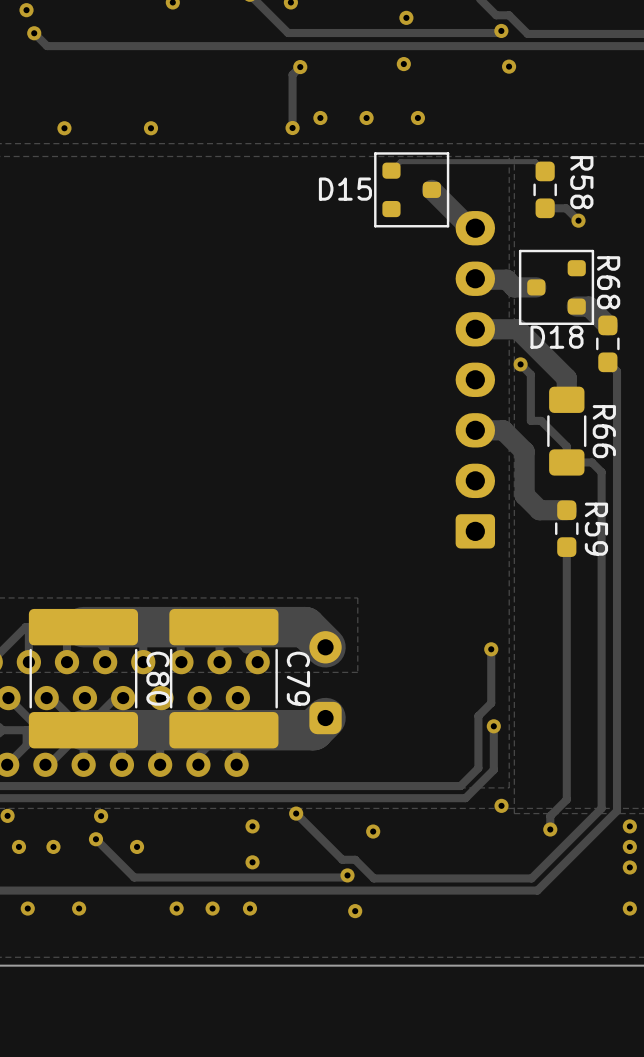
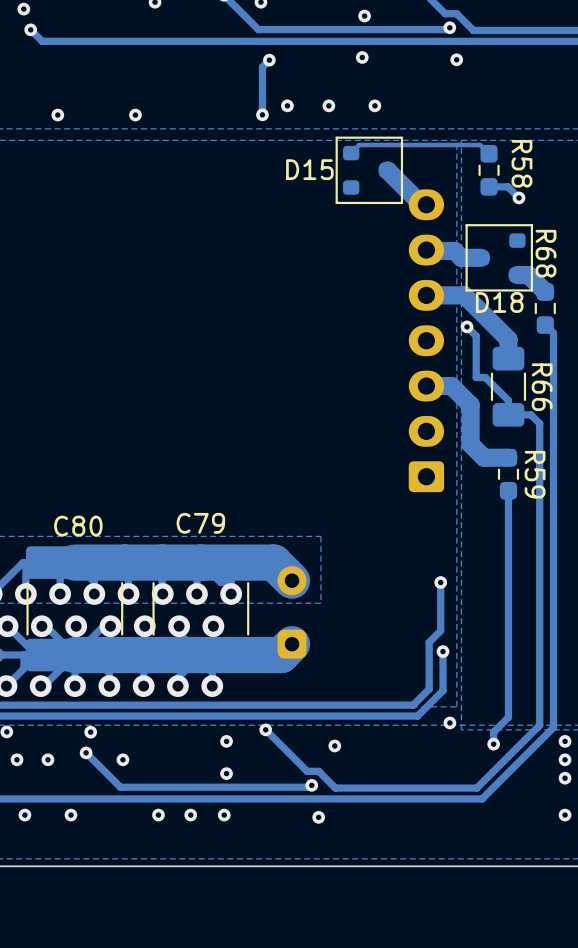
C80 name rotation: 0° (157, 678) -> 90° counterclockwise (78, 526)
C80 name position: C80 (157, 678) -> C80 (78, 526)
C79 name rotation: 0° (298, 678) -> 90° counterclockwise (200, 523)
C79 name position: C79 (298, 678) -> C79 (200, 523)

